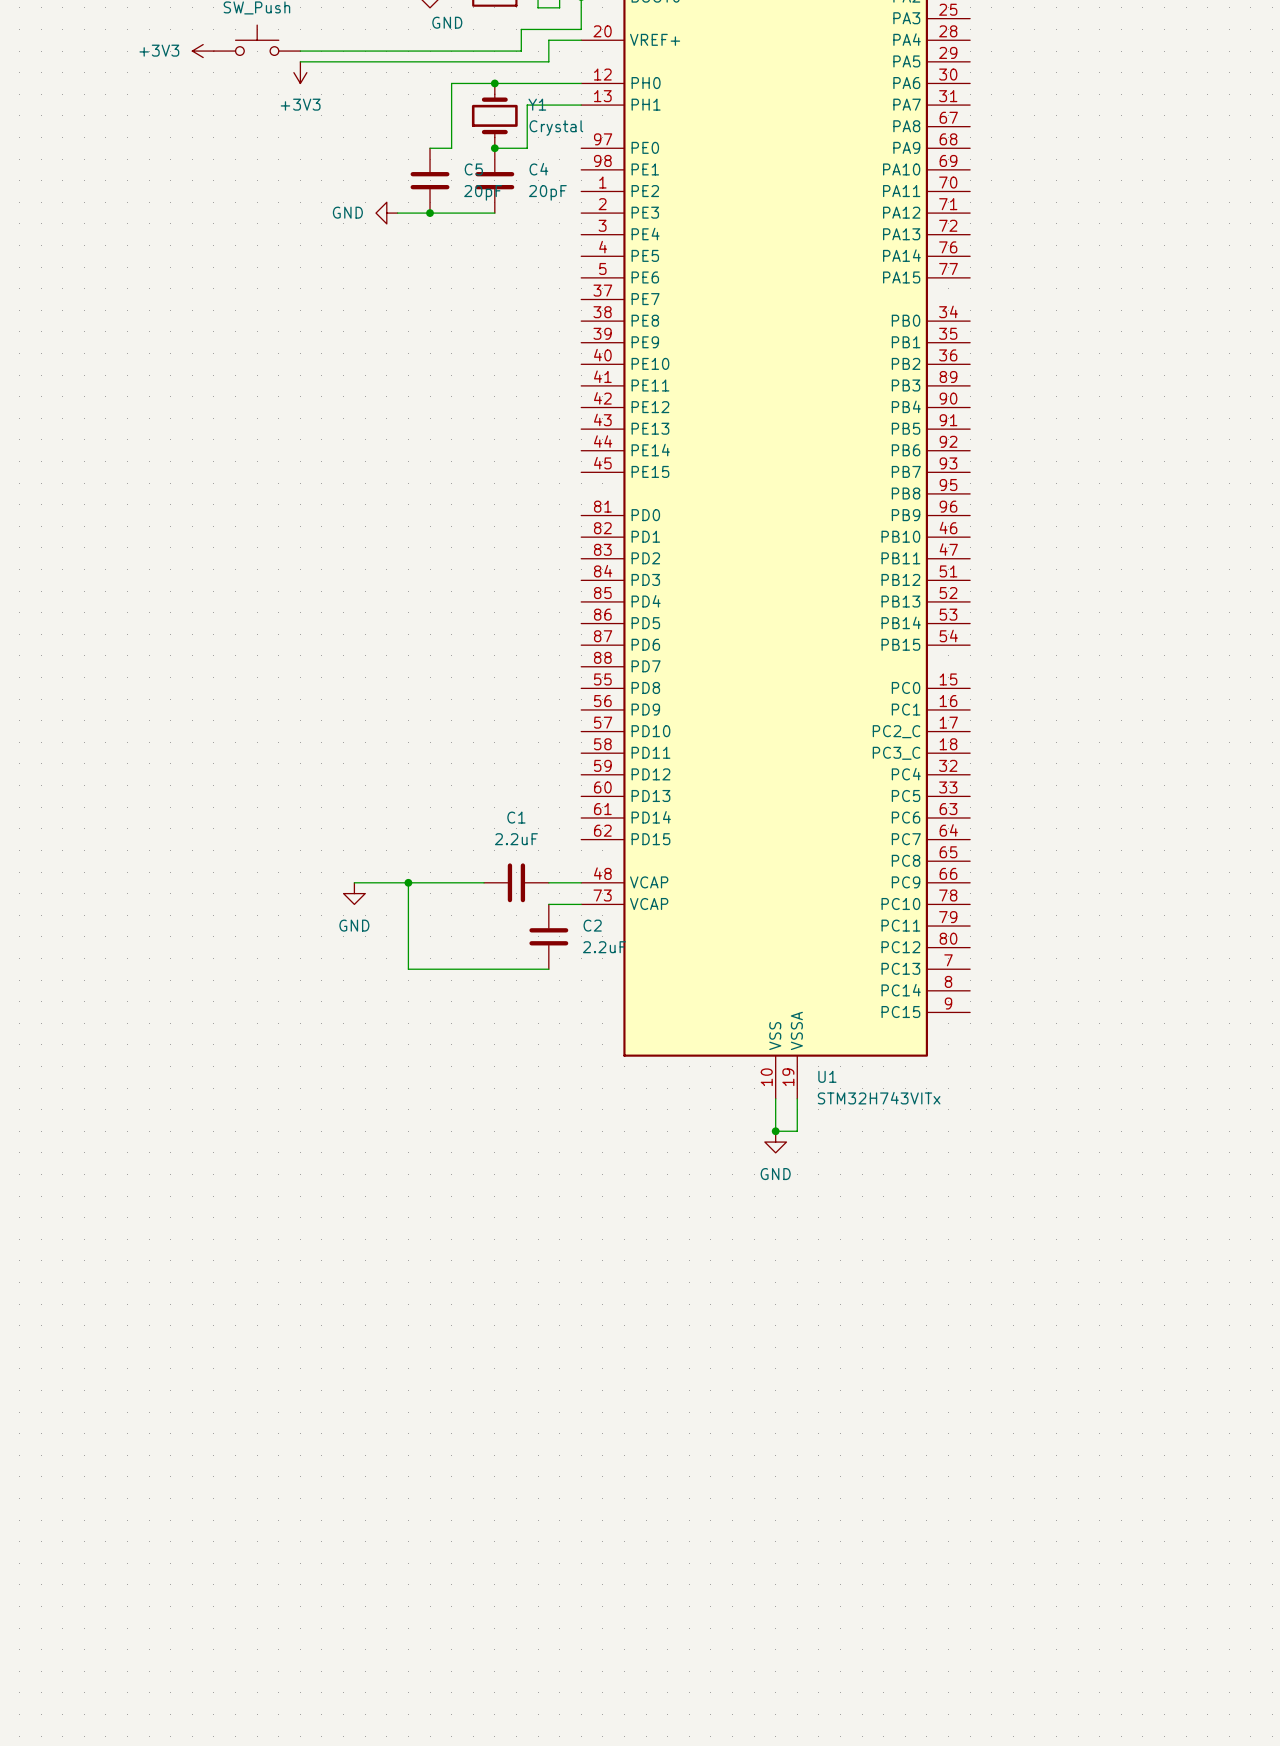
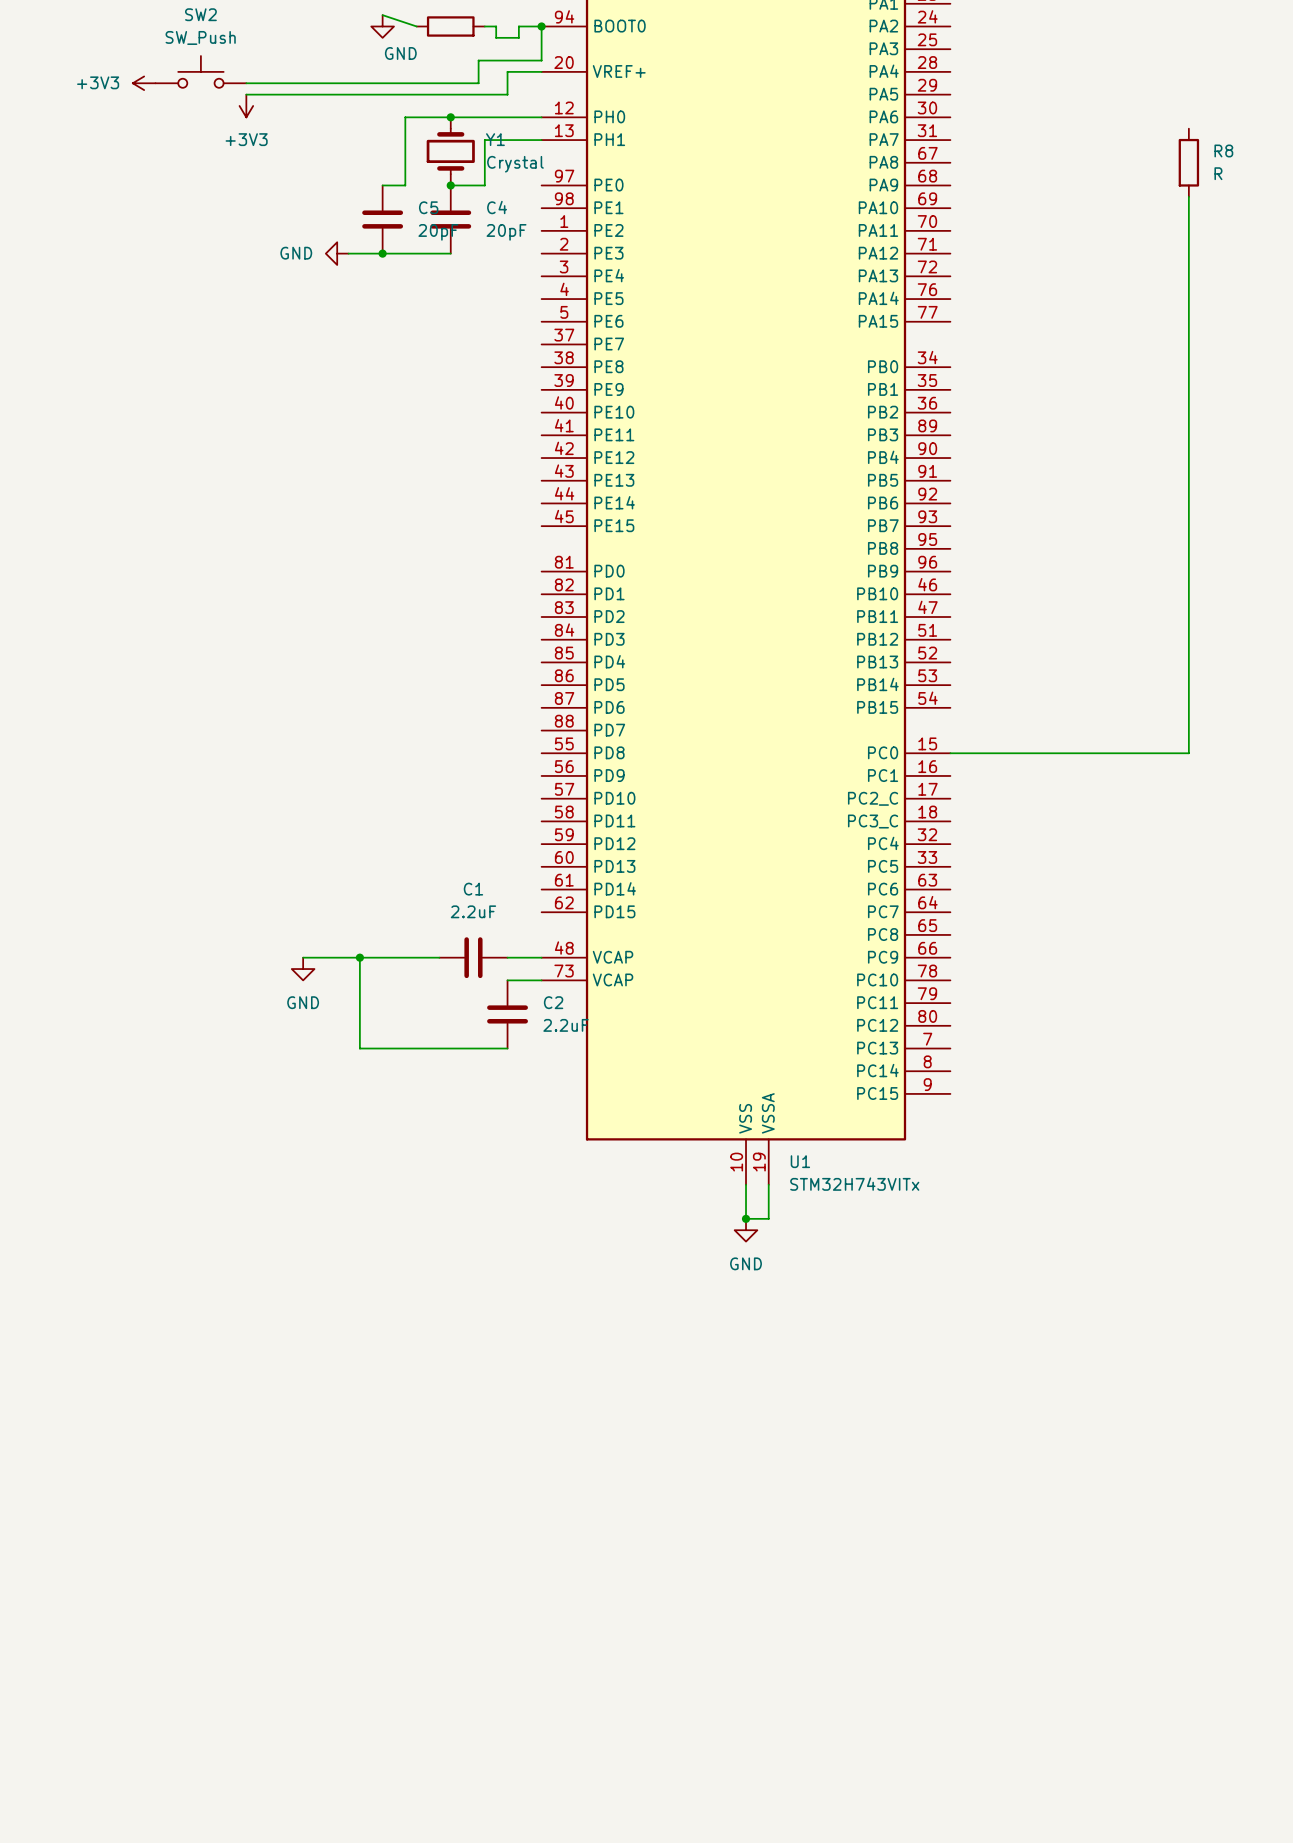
R8: none -> R (1188, 162)
wire: none -> (1188, 196) (1188, 753) (950, 753)

